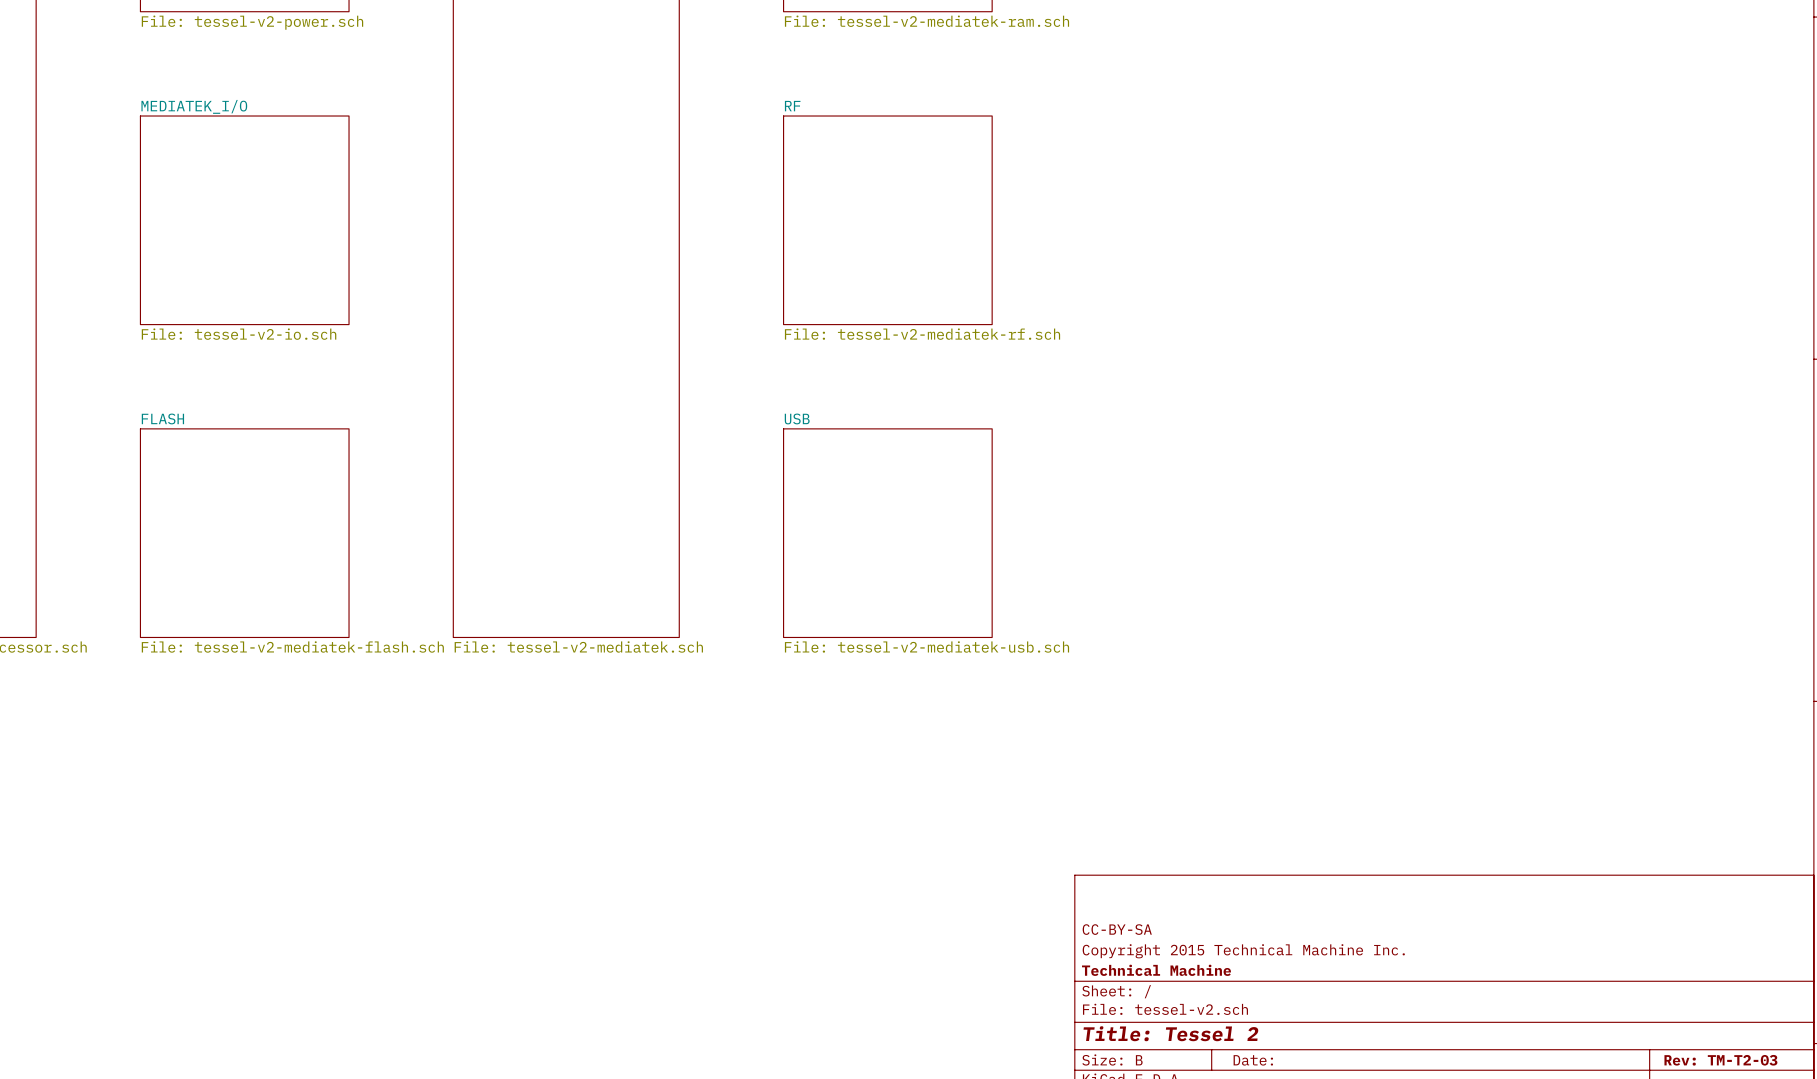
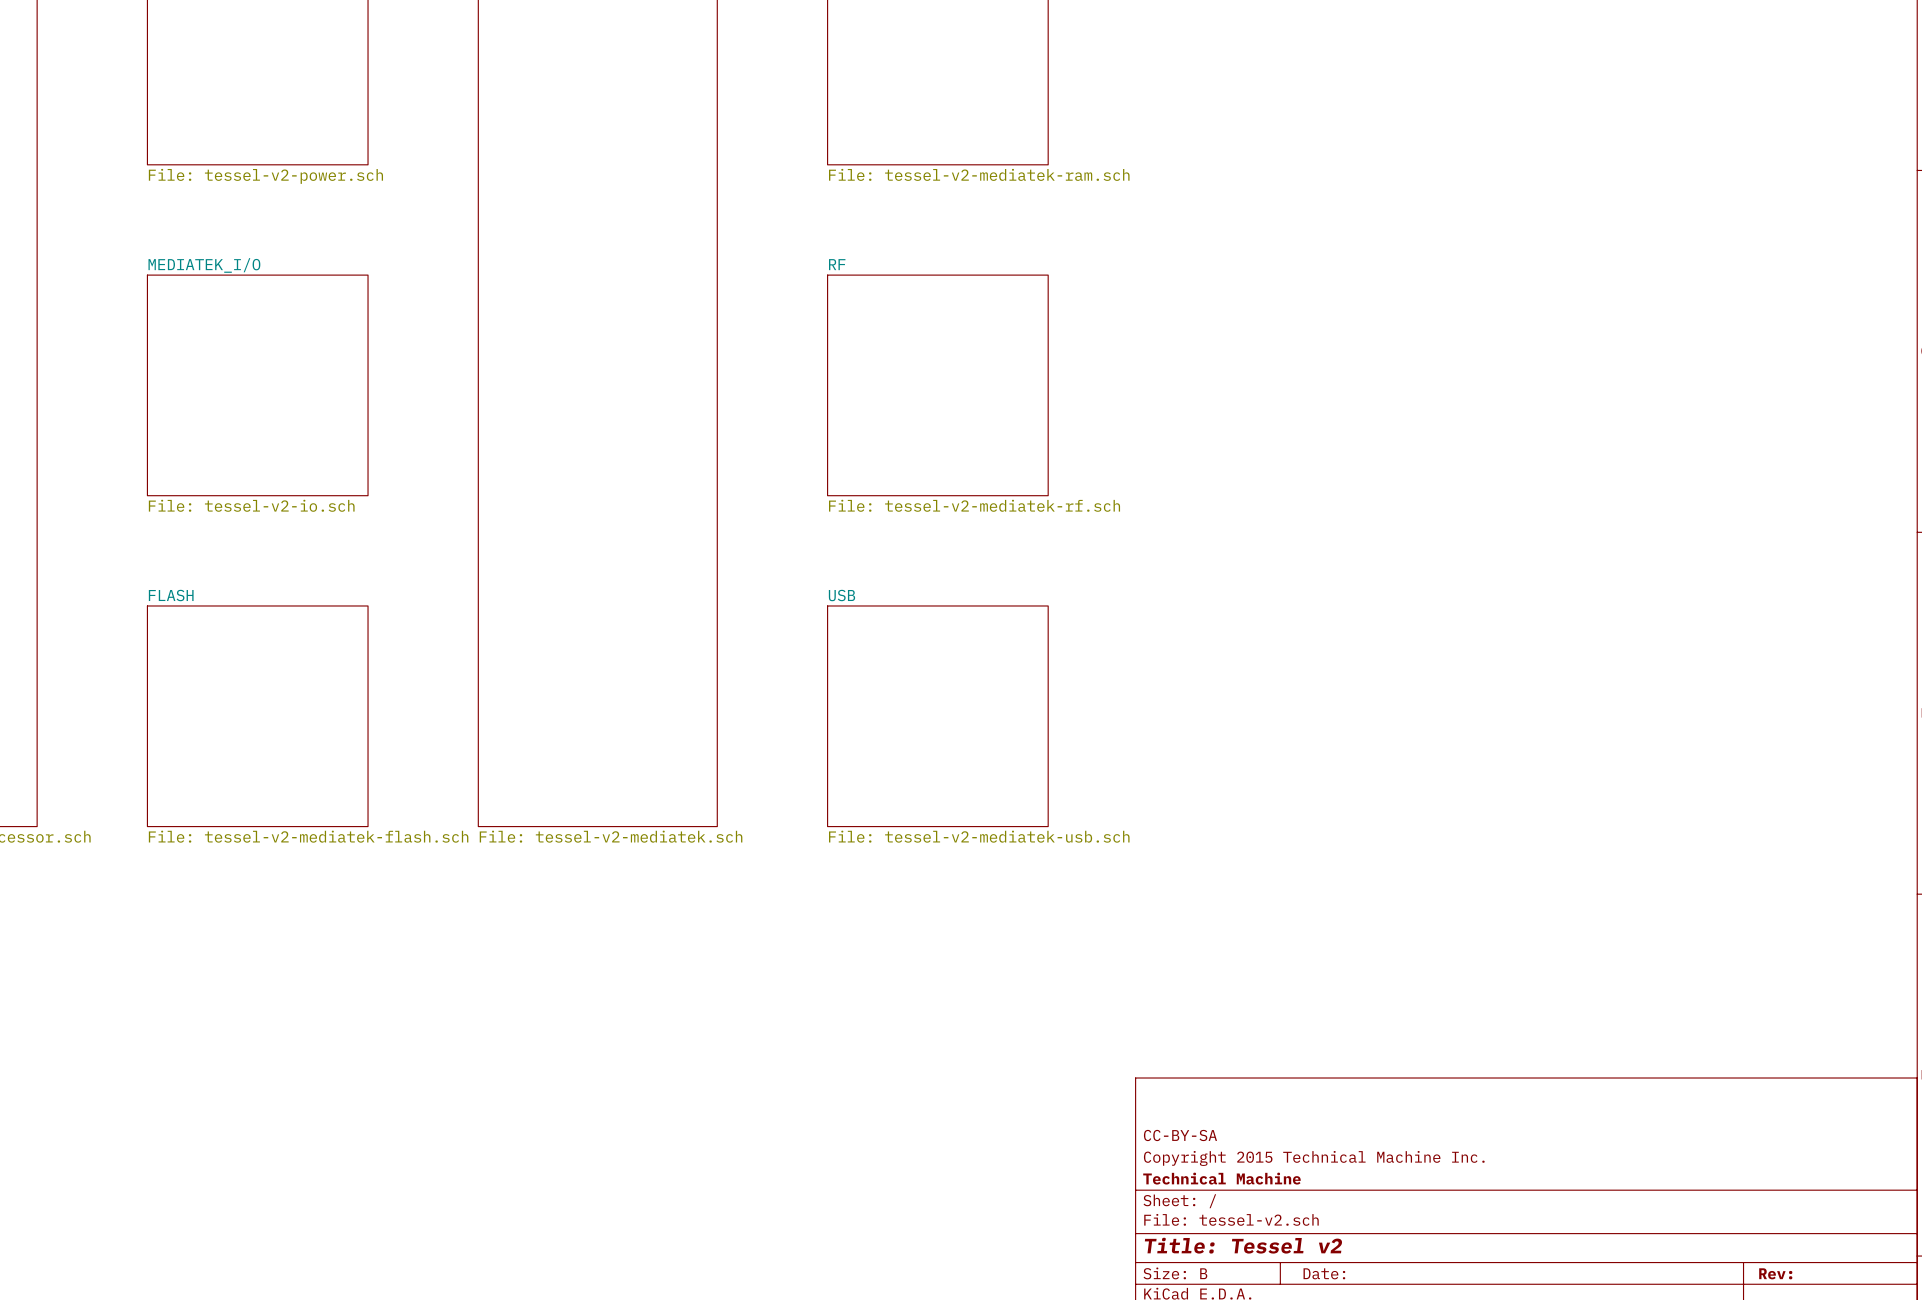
title block: Title: Tessel 2 (1170, 1033) -> Title: Tessel v2 (1243, 1245)
title block: Rev: TM-T2-03 (1720, 1060) -> Rev: (1775, 1273)

